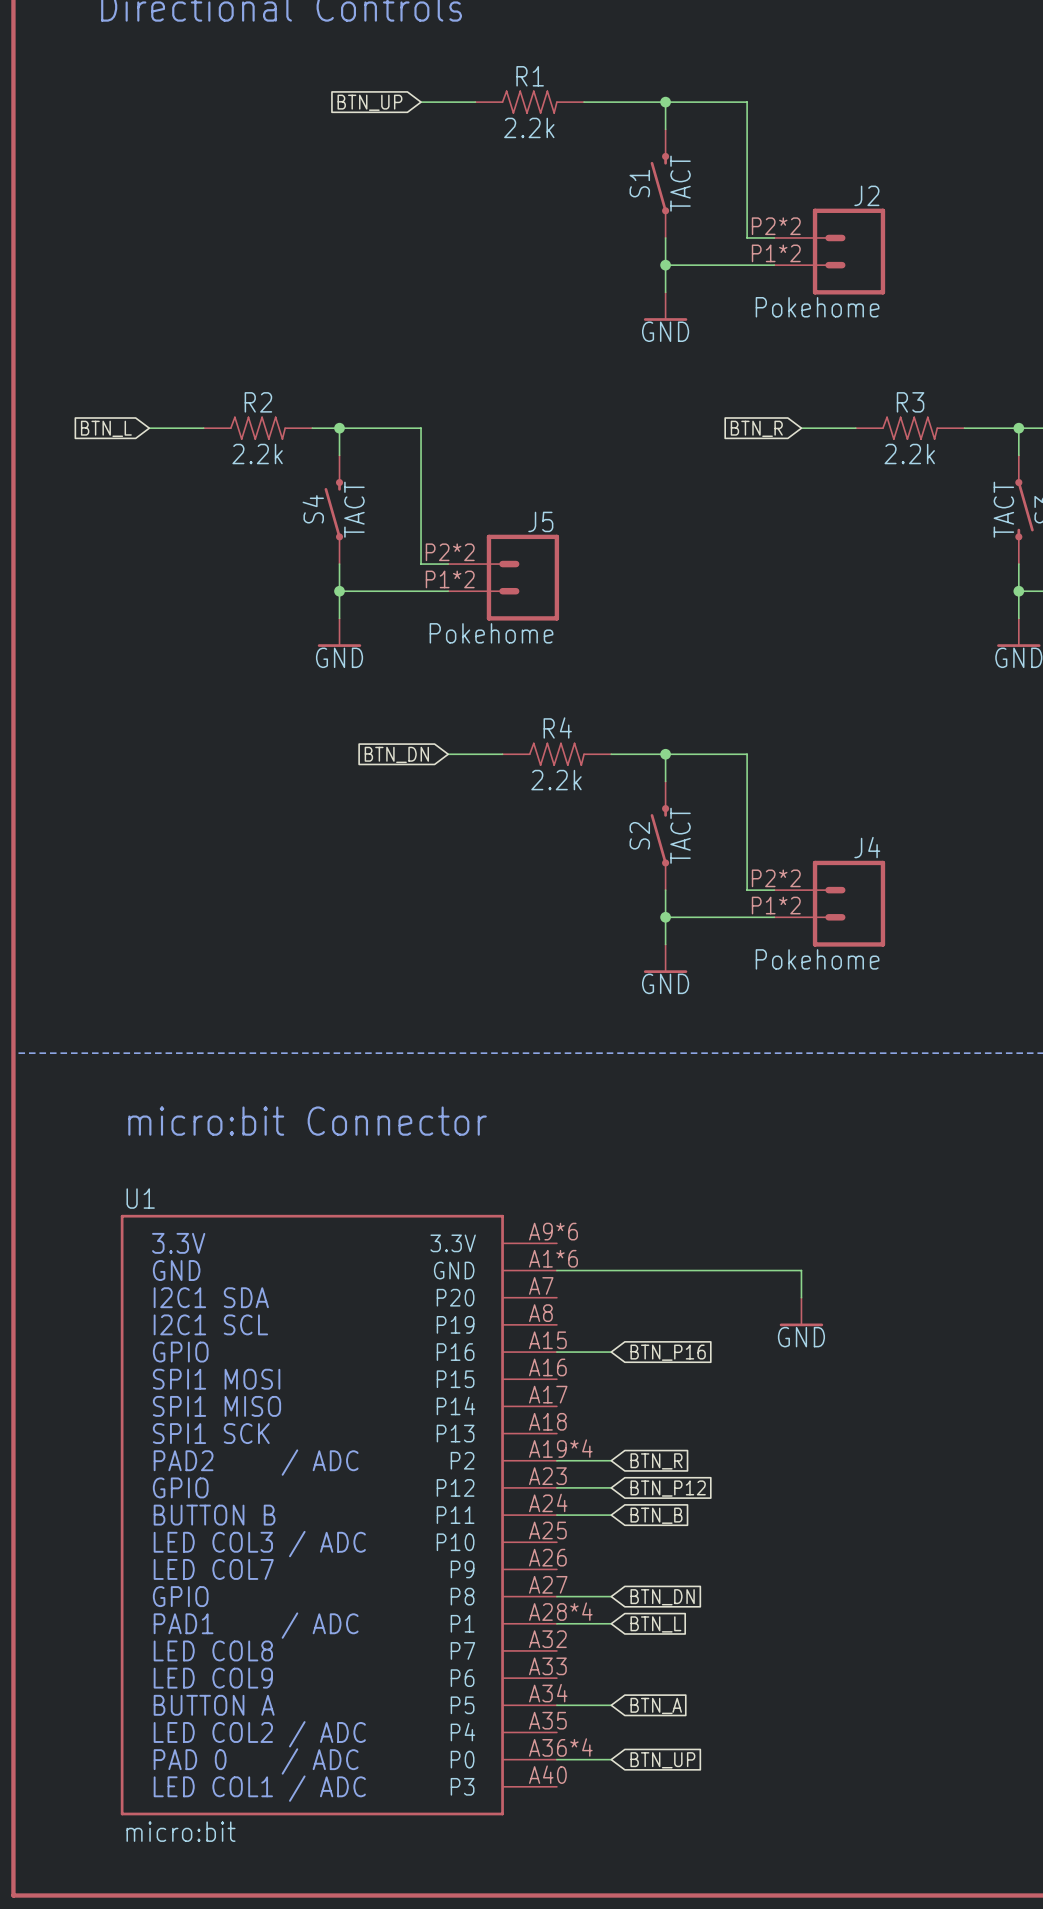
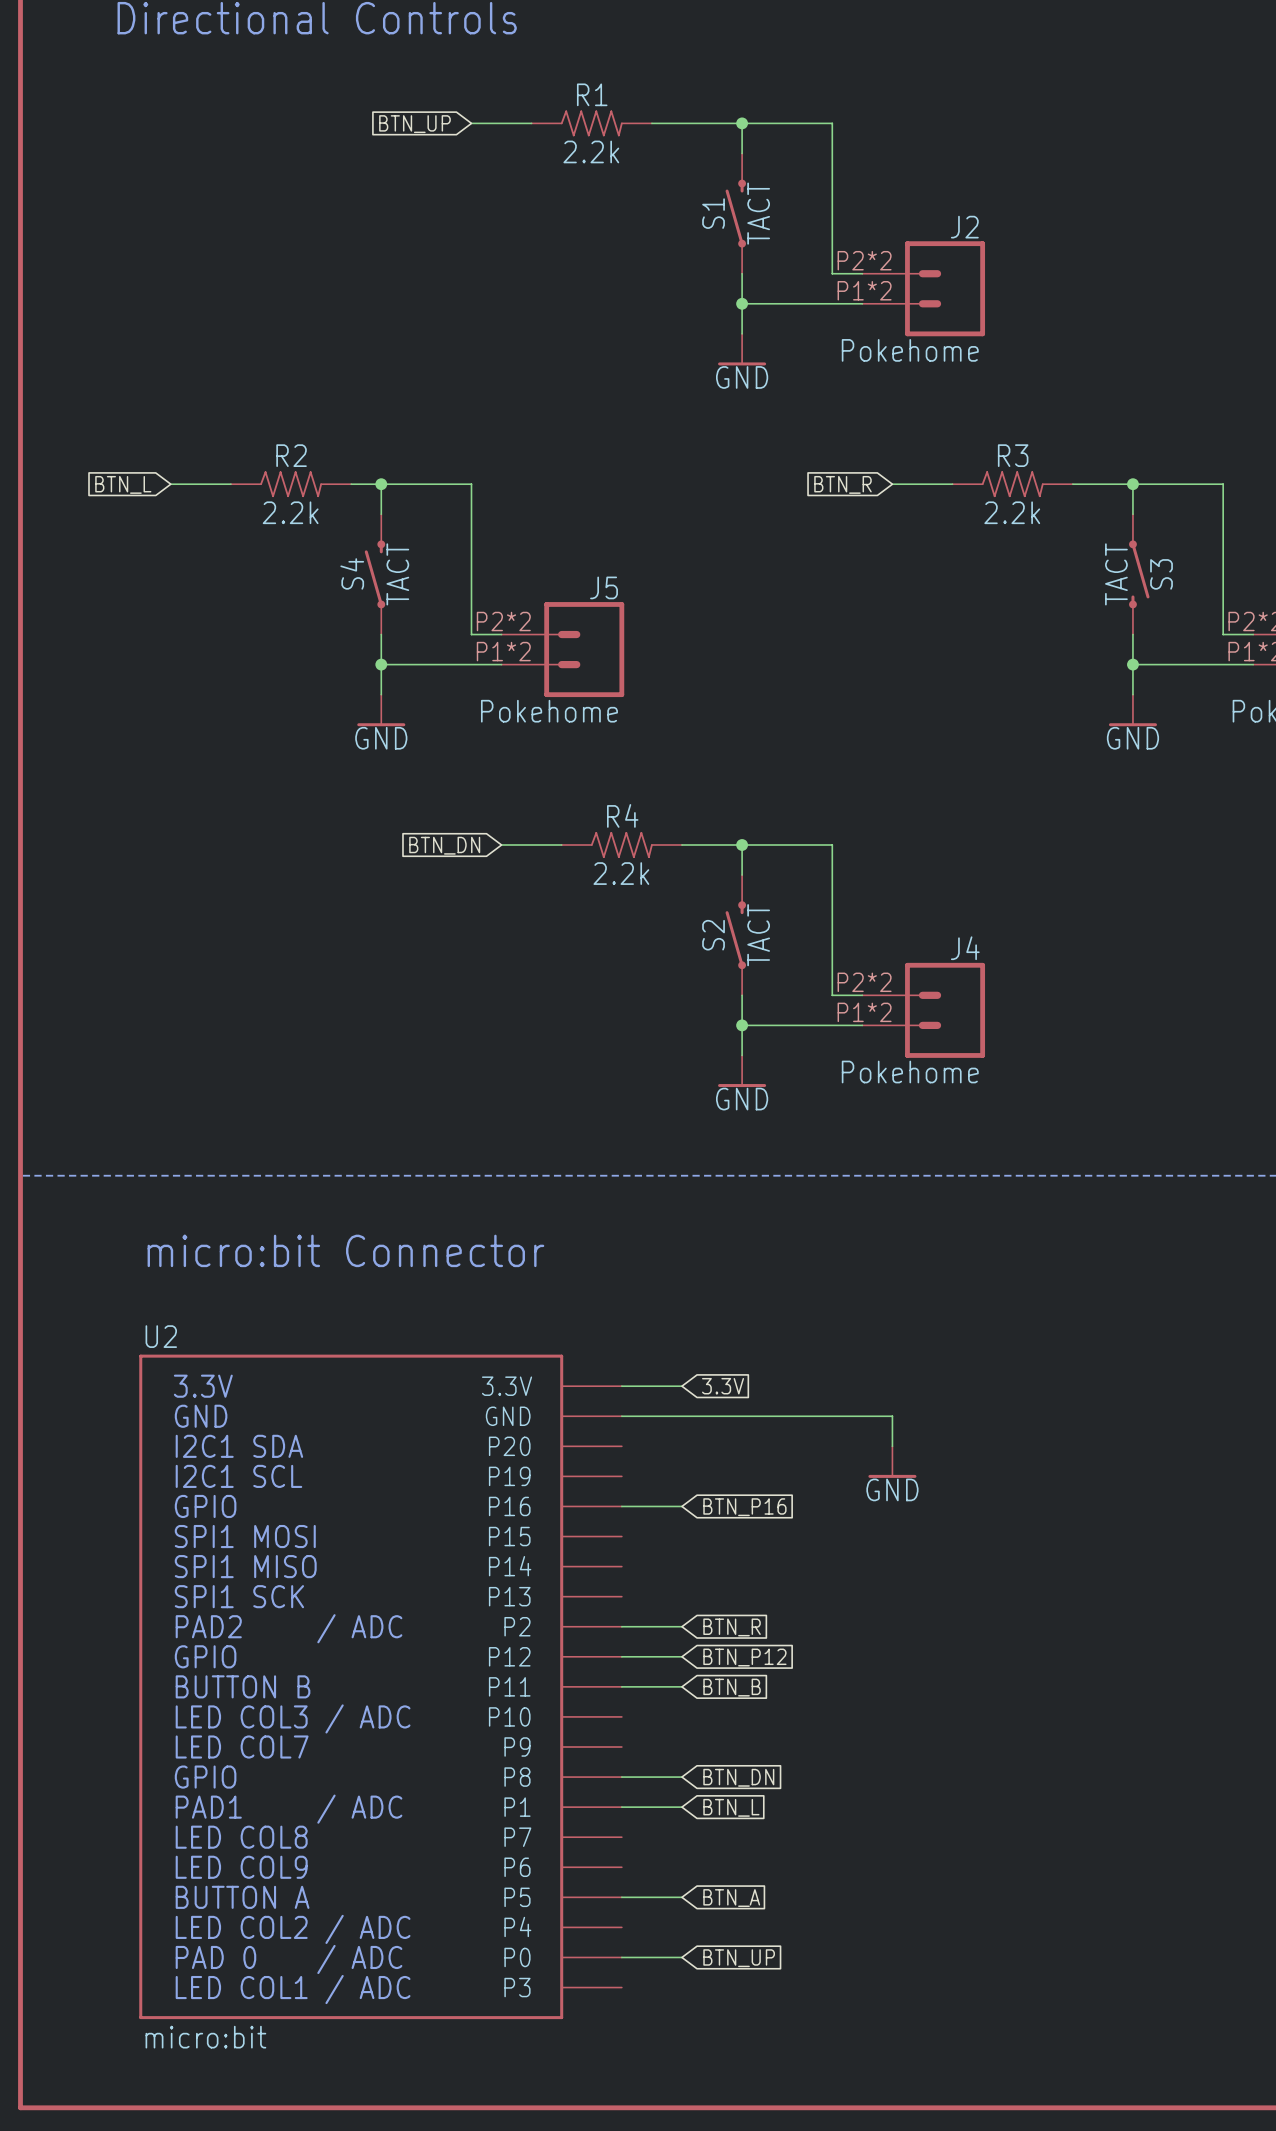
U1 name: U1 (140, 1198) -> U2 (161, 1336)
U1 symbol: [120, 1214, 557, 1816] -> [139, 1354, 622, 2020]
wire: none -> (621, 1386) (681, 1386)
global label: none -> 3.3V (723, 1386)

